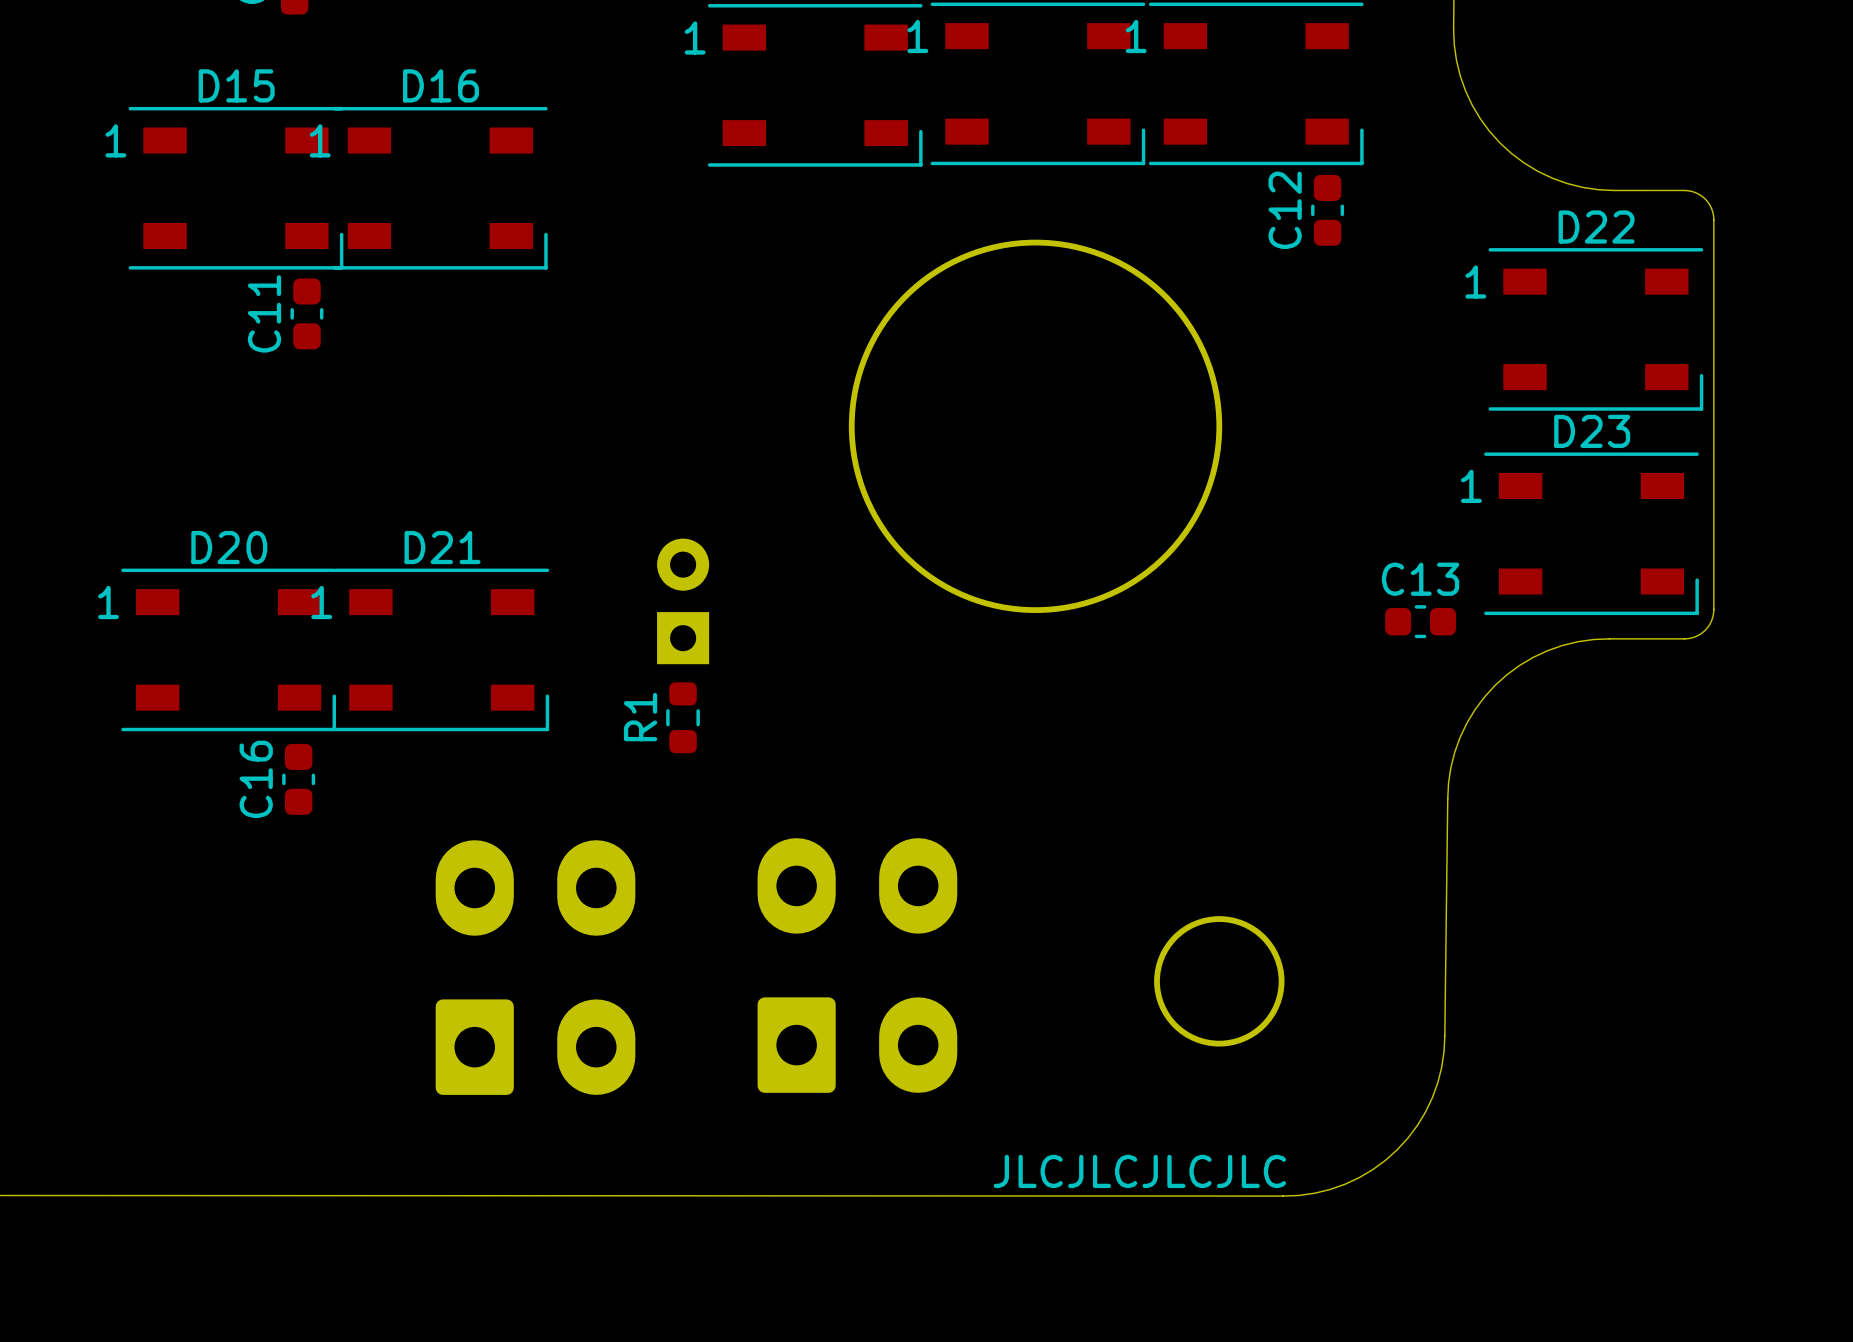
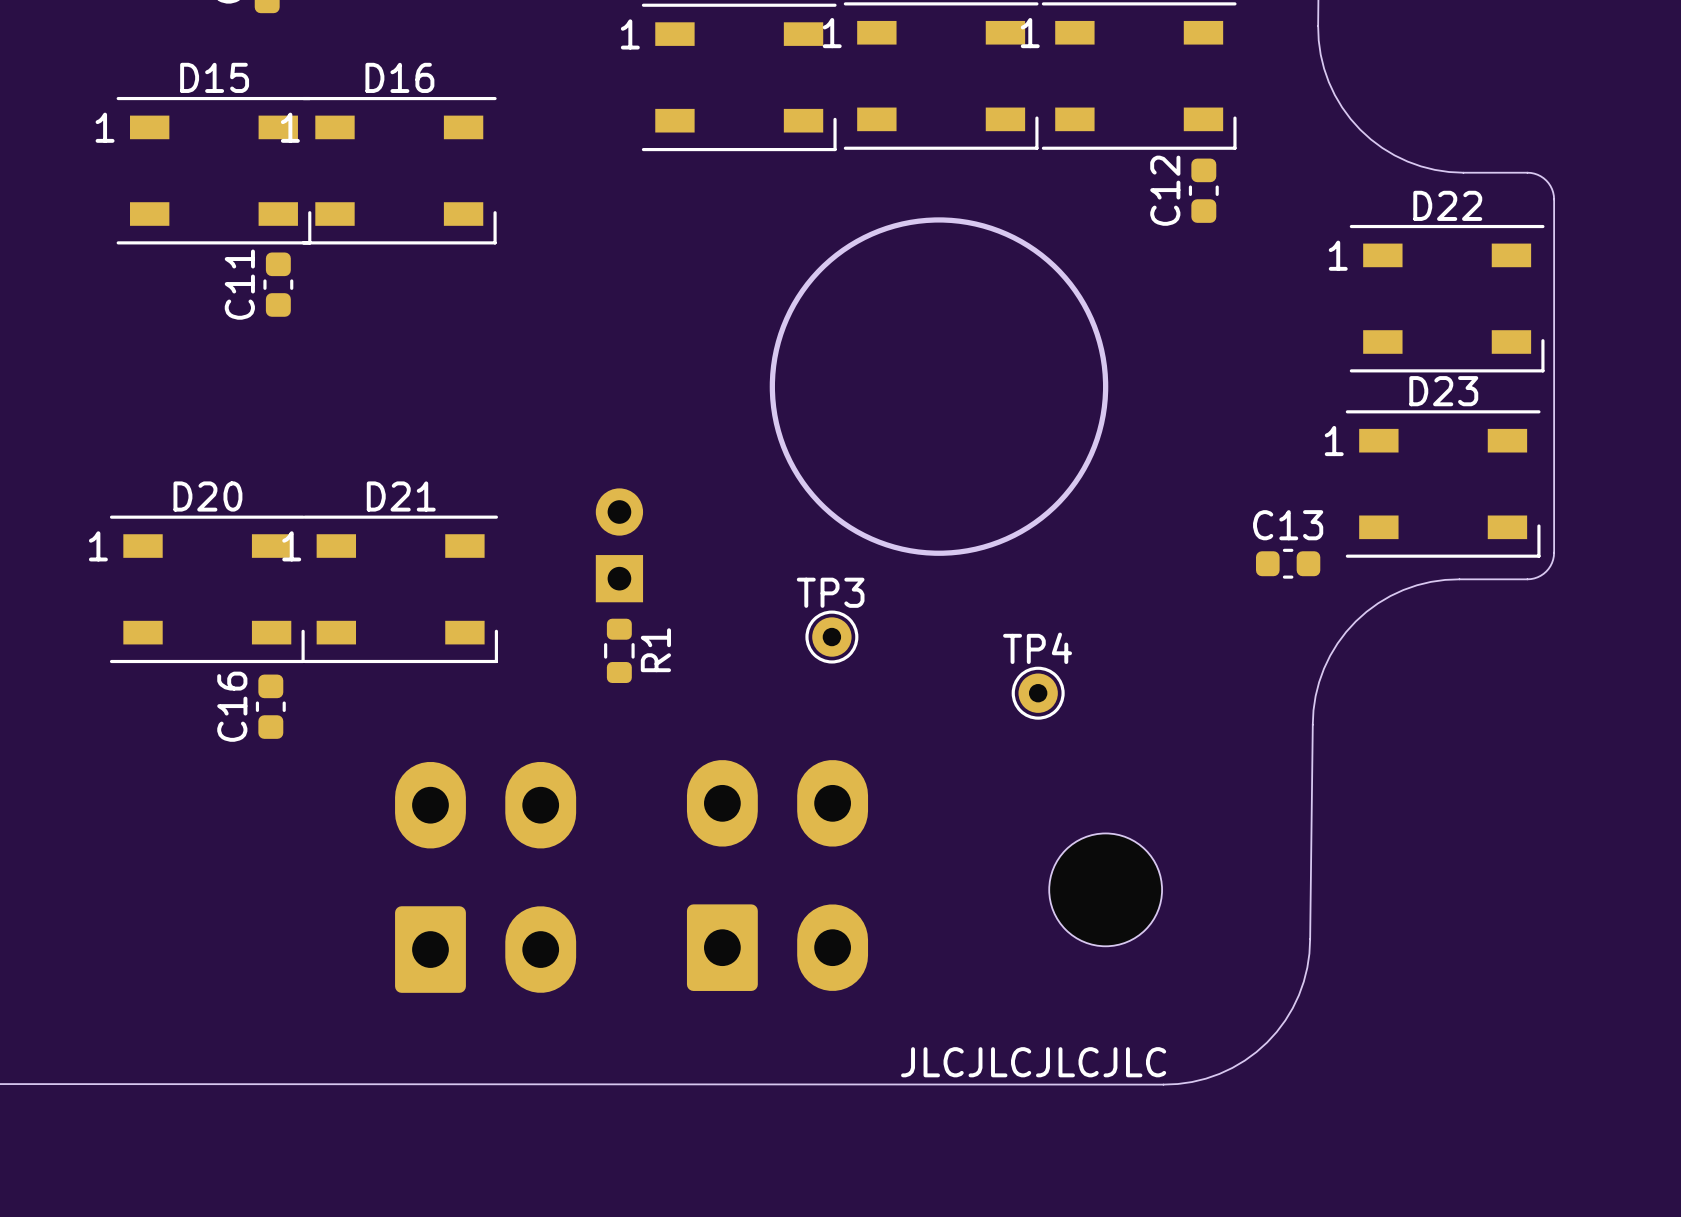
part: none -> (831, 637)
R1 name position: R1 (640, 717) -> R1 (655, 650)
part: none -> (1038, 693)
round board edge: [1154, 916, 1285, 1047] -> none
part: none -> (1105, 889)

